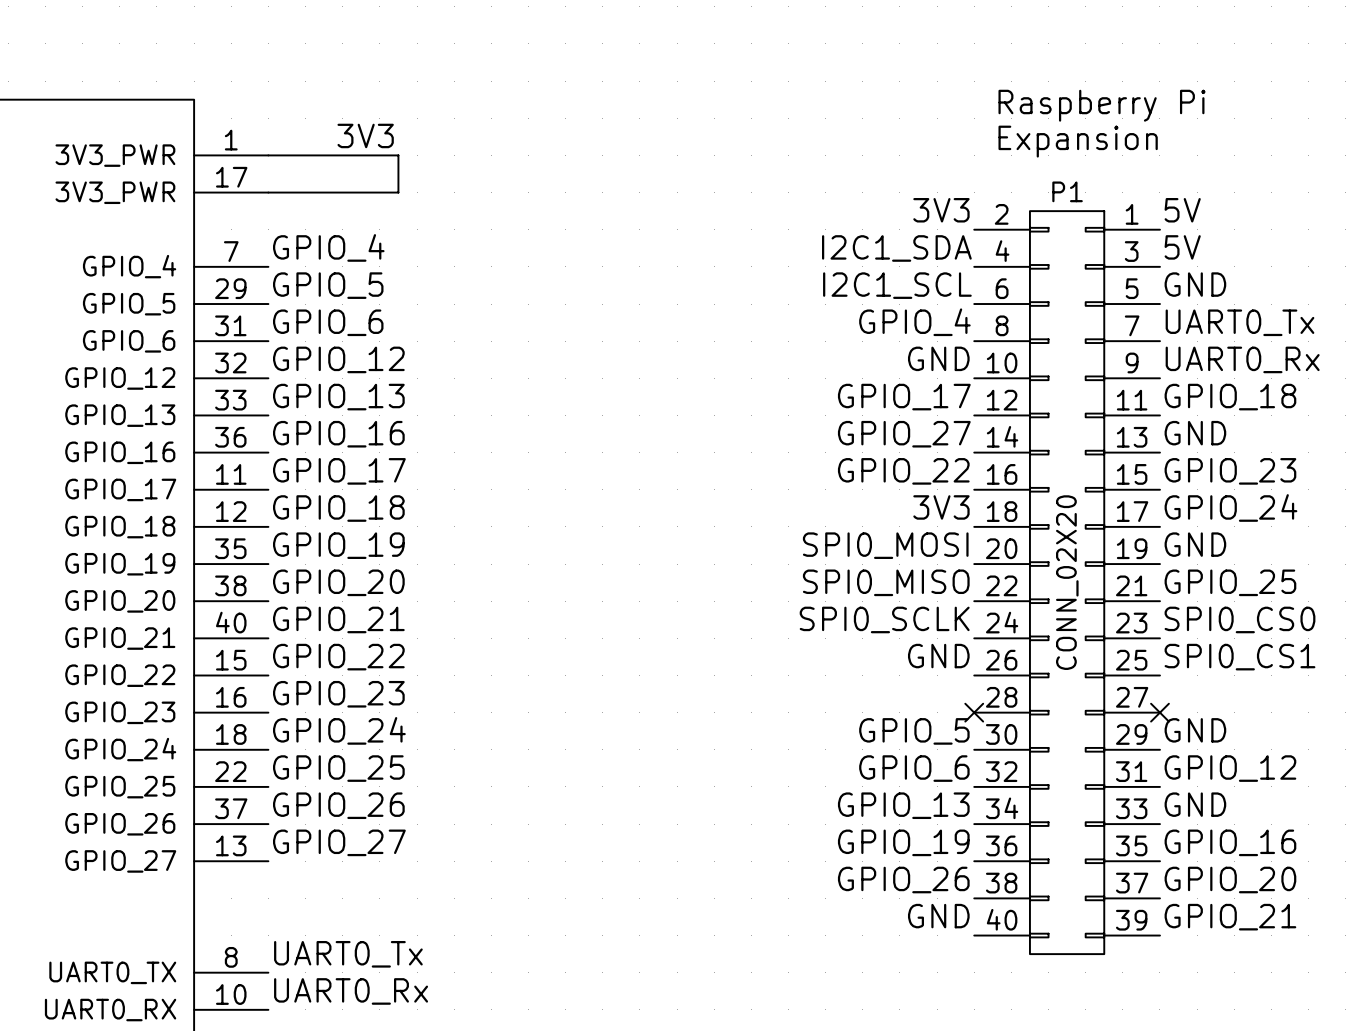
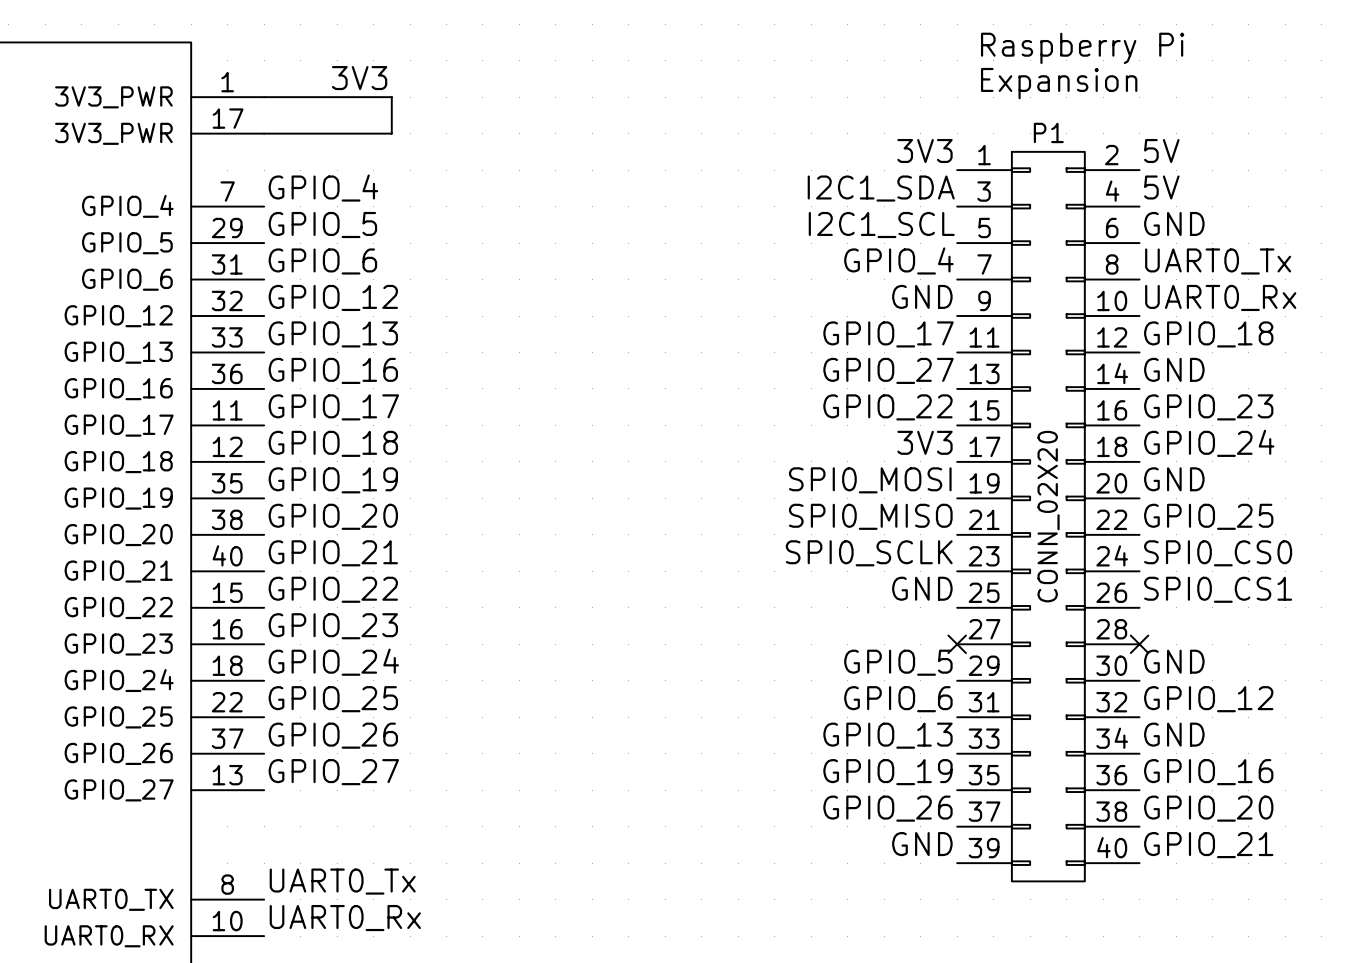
P1 flip: as is (1067, 582) -> left-right (1048, 516)

